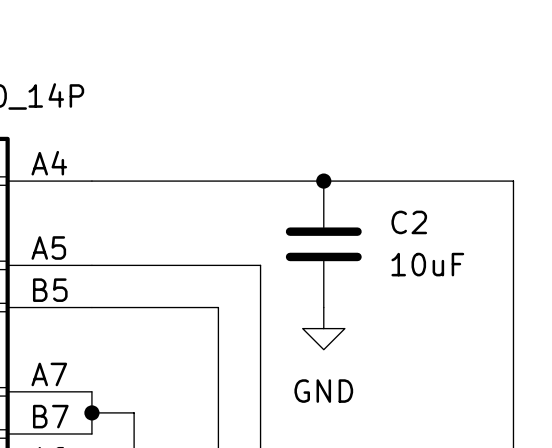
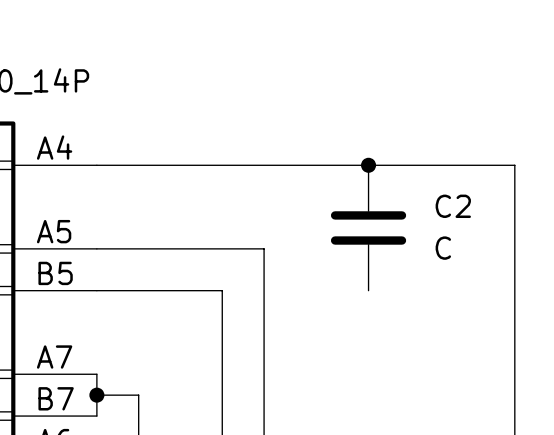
junction position: (323, 181) -> (368, 165)
C2 position: (323, 244) -> (368, 227)
C2 value: 10uF (427, 264) -> C (443, 248)
power symbol: GND (323, 328) -> none

